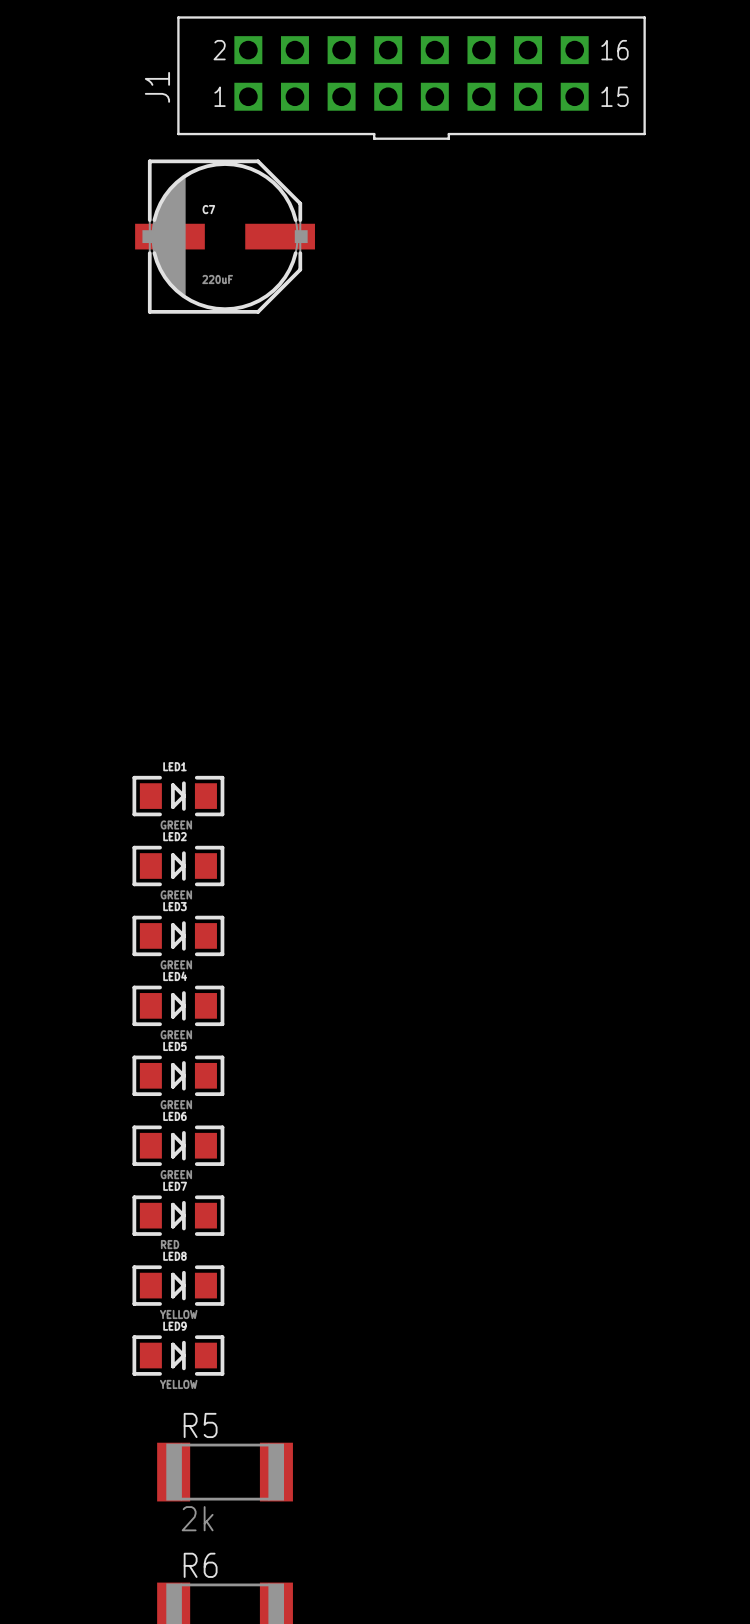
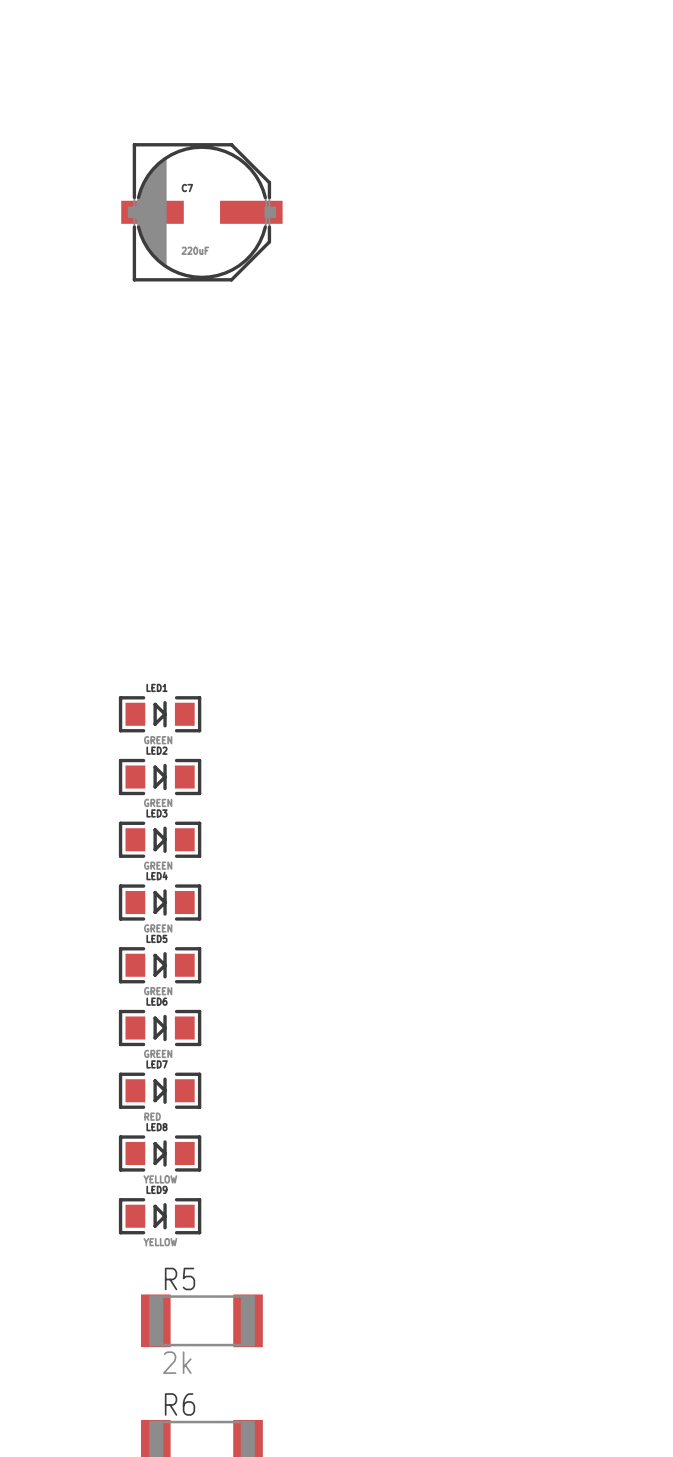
J1: (411, 78) -> none

